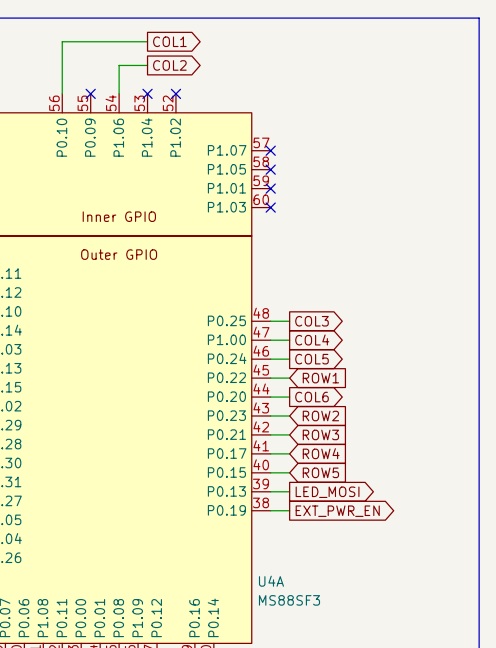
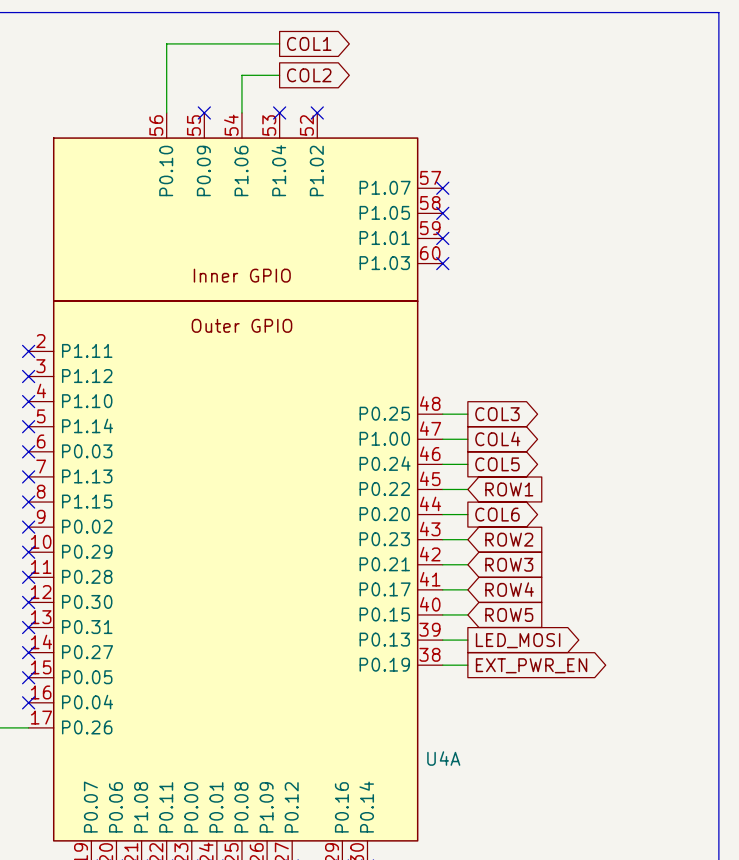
U4A value: MS88SF3 (289, 600) -> none

